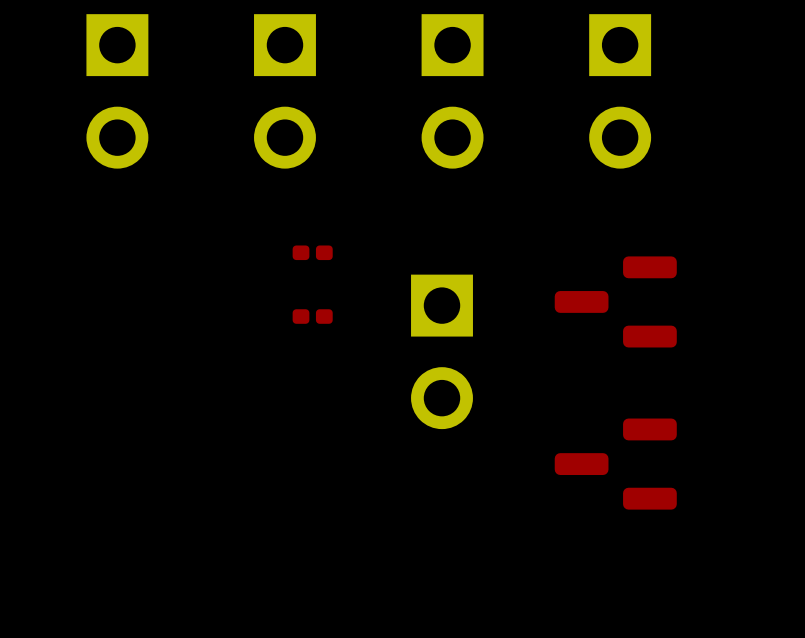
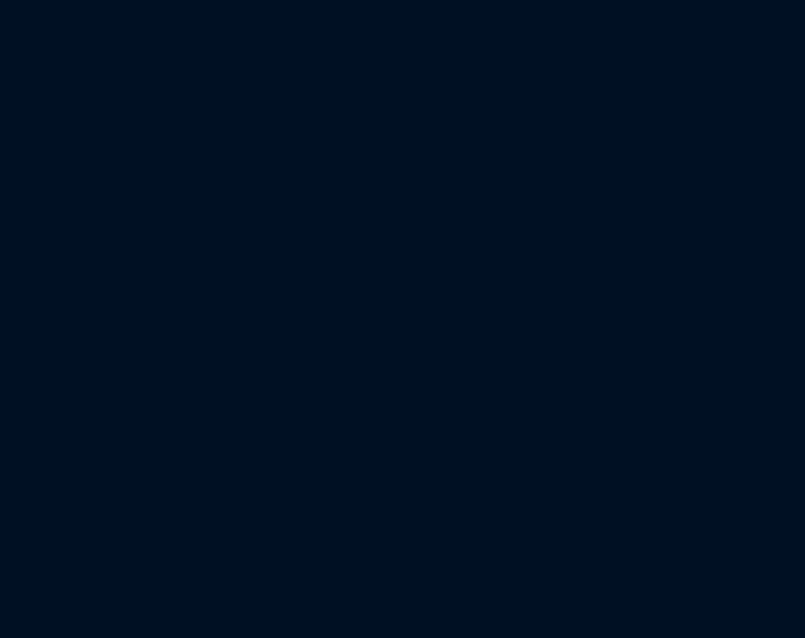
part: (117, 91) -> none
part: (284, 91) -> none
part: (452, 91) -> none
part: (620, 91) -> none
part: (312, 252) -> none
part: (615, 301) -> none
part: (312, 316) -> none
part: (441, 351) -> none
part: (615, 464) -> none

